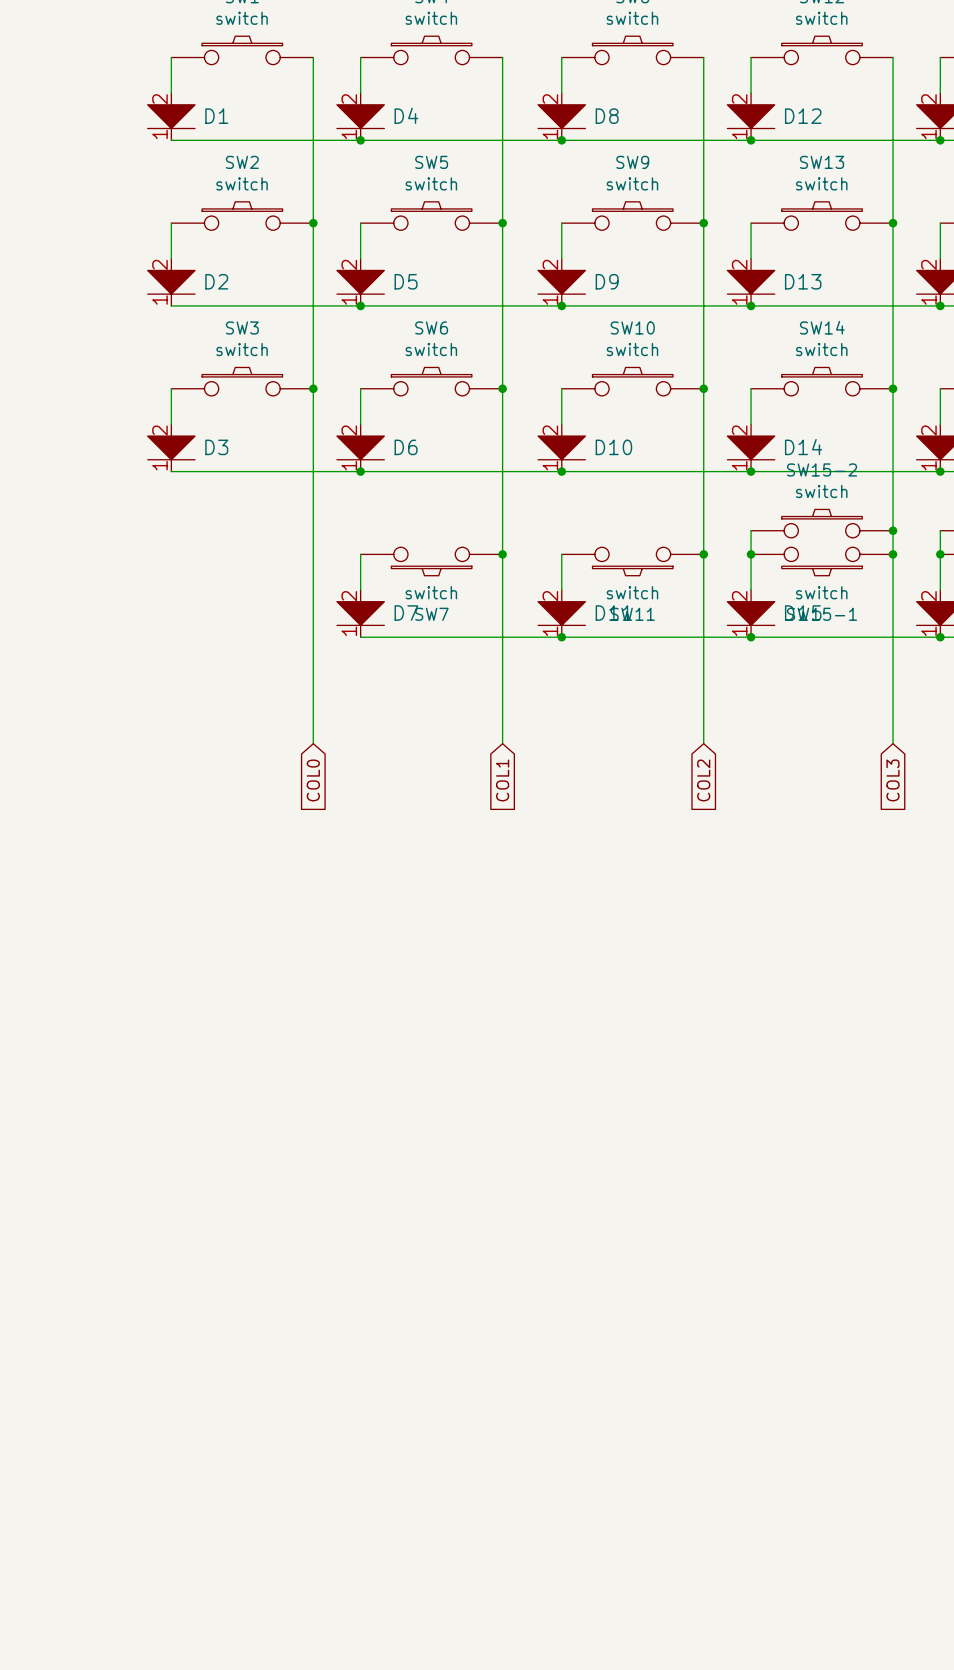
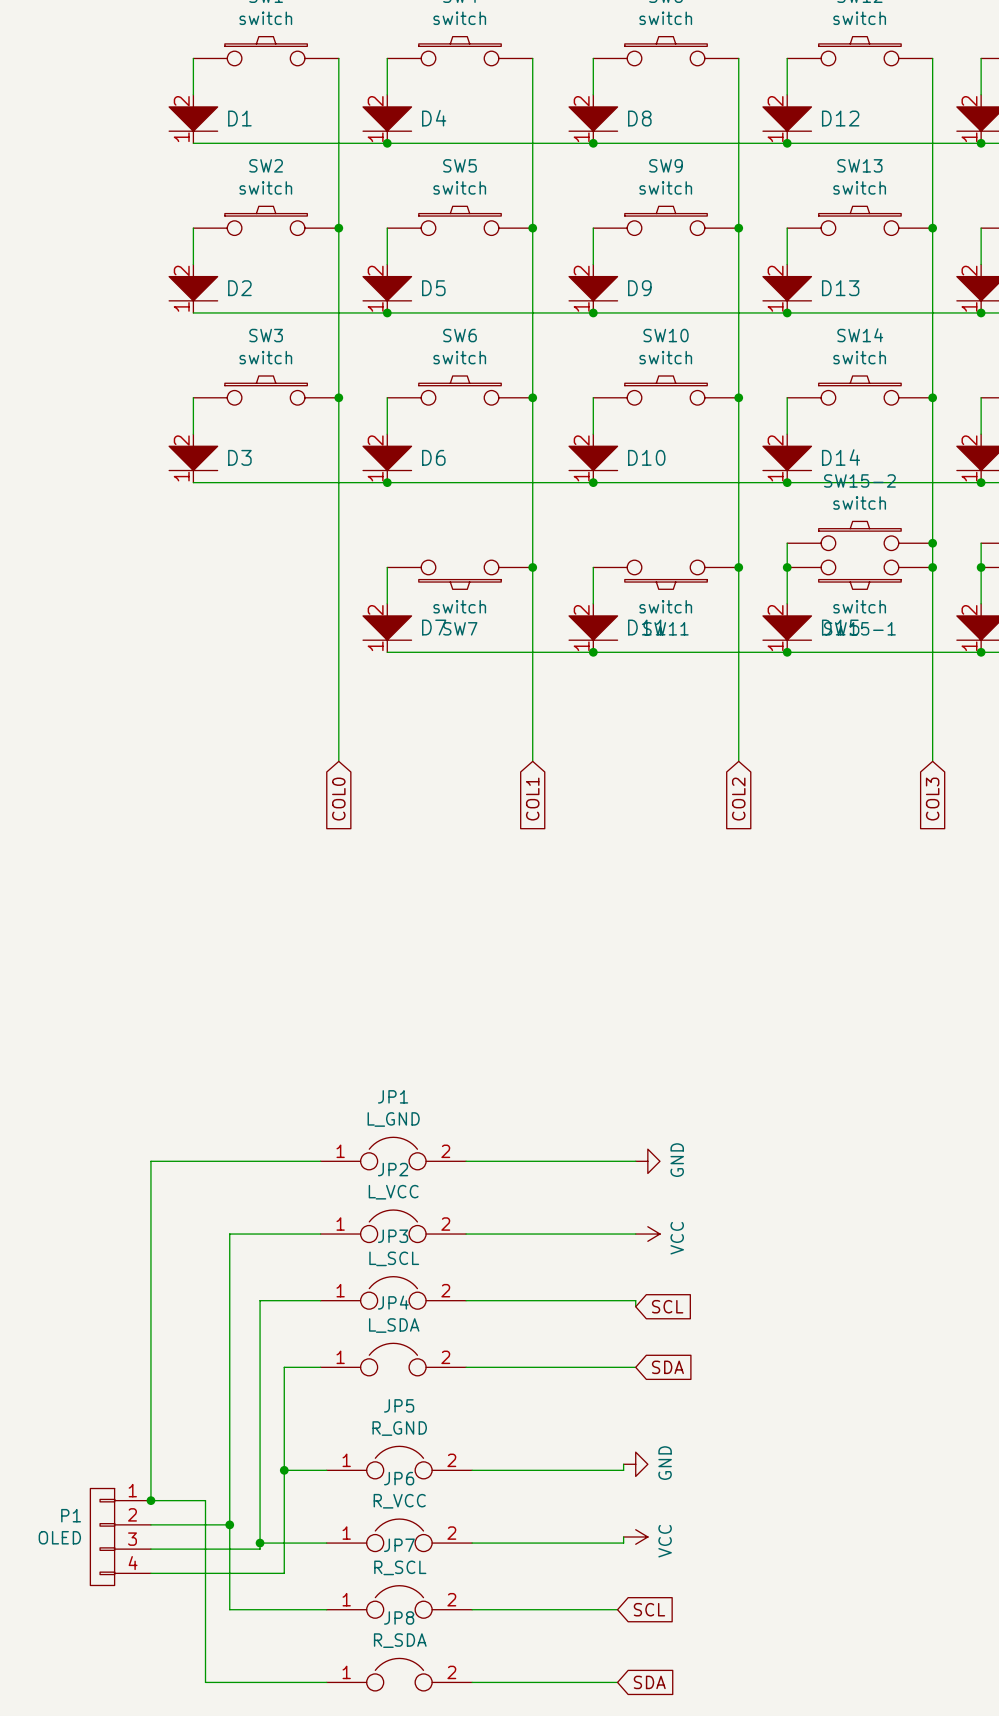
JP1: none -> L_GND (393, 1153)
wire: none -> (320, 1161) (150, 1161) (150, 1500) (205, 1500) (205, 1682) (326, 1682)
wire: none -> (466, 1161) (635, 1161)
power symbol: none -> GND (647, 1161)
JP2: none -> L_VCC (393, 1226)
wire: none -> (320, 1234) (229, 1234) (229, 1609) (326, 1609)
wire: none -> (466, 1234) (635, 1234)
power symbol: none -> VCC (647, 1234)
JP3: none -> L_SCL (393, 1292)
wire: none -> (320, 1300) (260, 1300) (260, 1549) (150, 1549)
wire: none -> (466, 1300) (635, 1300) (635, 1306)
global label: none -> SCL (667, 1306)
JP4: none -> L_SDA (393, 1359)
wire: none -> (320, 1367) (284, 1367) (284, 1573) (150, 1573)
wire: none -> (466, 1367) (635, 1367)
global label: none -> SDA (667, 1367)
JP5: none -> R_GND (399, 1462)
wire: none -> (623, 1464) (623, 1470) (472, 1470)
power symbol: none -> GND (635, 1464)
wire: none -> (284, 1470) (326, 1470)
junction: none -> (284, 1470)
junction: none -> (150, 1500)
wire: none -> (150, 1524) (229, 1524)
junction: none -> (229, 1524)
JP6: none -> R_VCC (399, 1535)
P1: none -> OLED (120, 1536)
wire: none -> (623, 1536) (623, 1543) (472, 1543)
power symbol: none -> VCC (635, 1536)
wire: none -> (260, 1543) (326, 1543)
junction: none -> (260, 1543)
JP7: none -> R_SCL (399, 1601)
wire: none -> (472, 1609) (617, 1609)
global label: none -> SCL (649, 1609)
JP8: none -> R_SDA (399, 1674)
wire: none -> (472, 1682) (617, 1682)
global label: none -> SDA (649, 1682)

